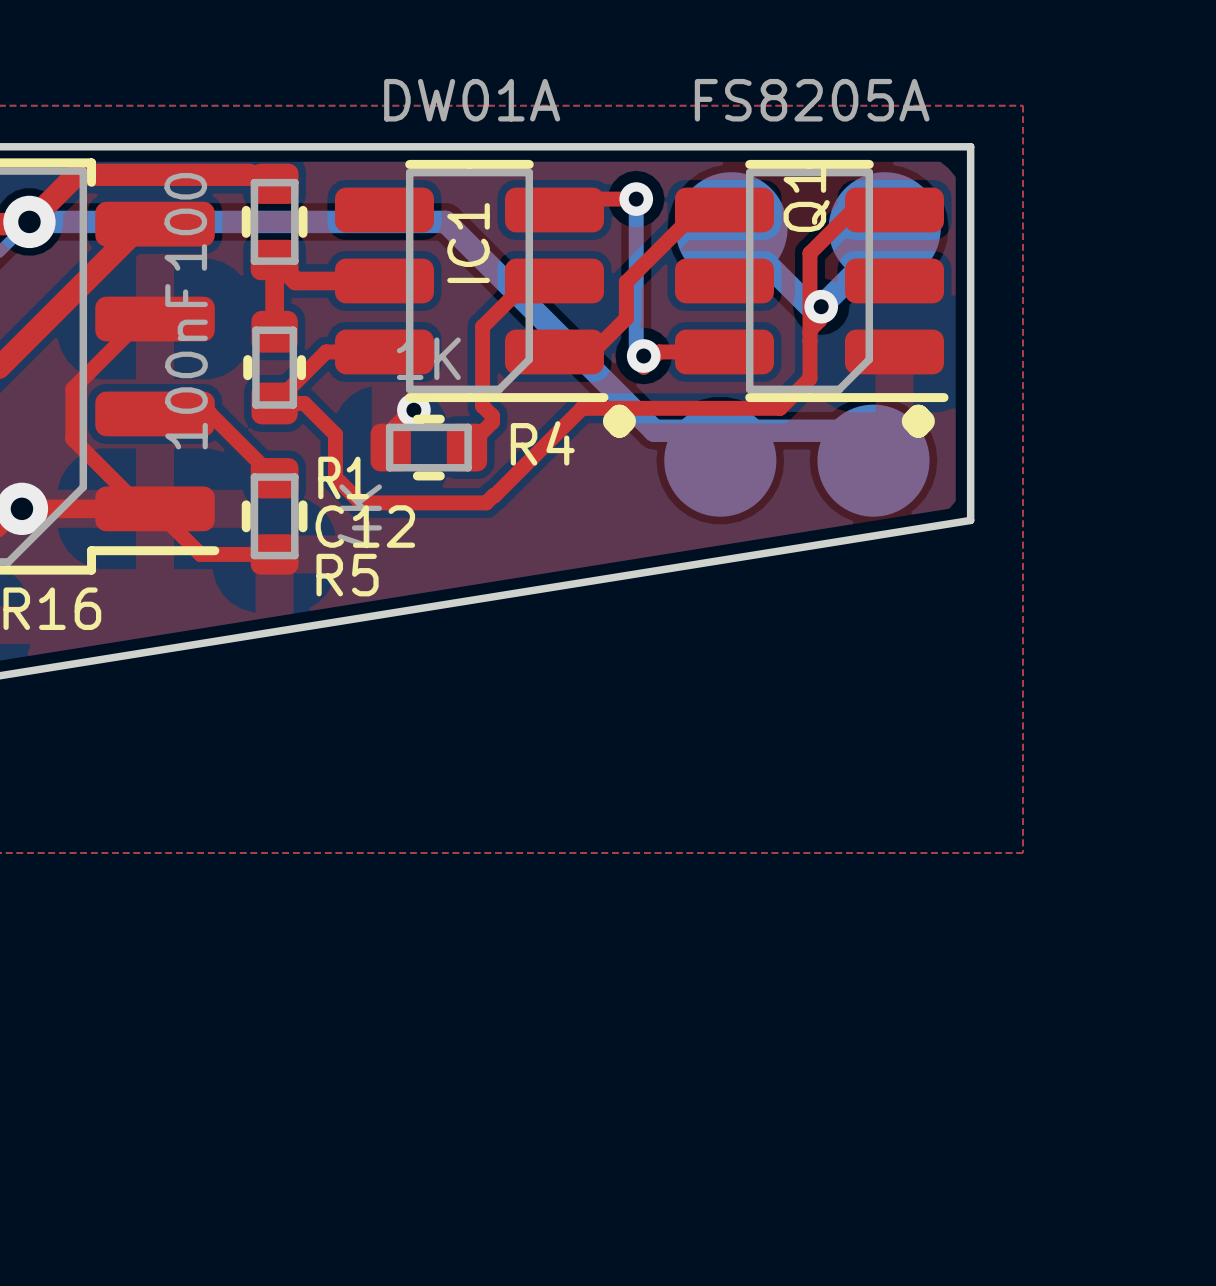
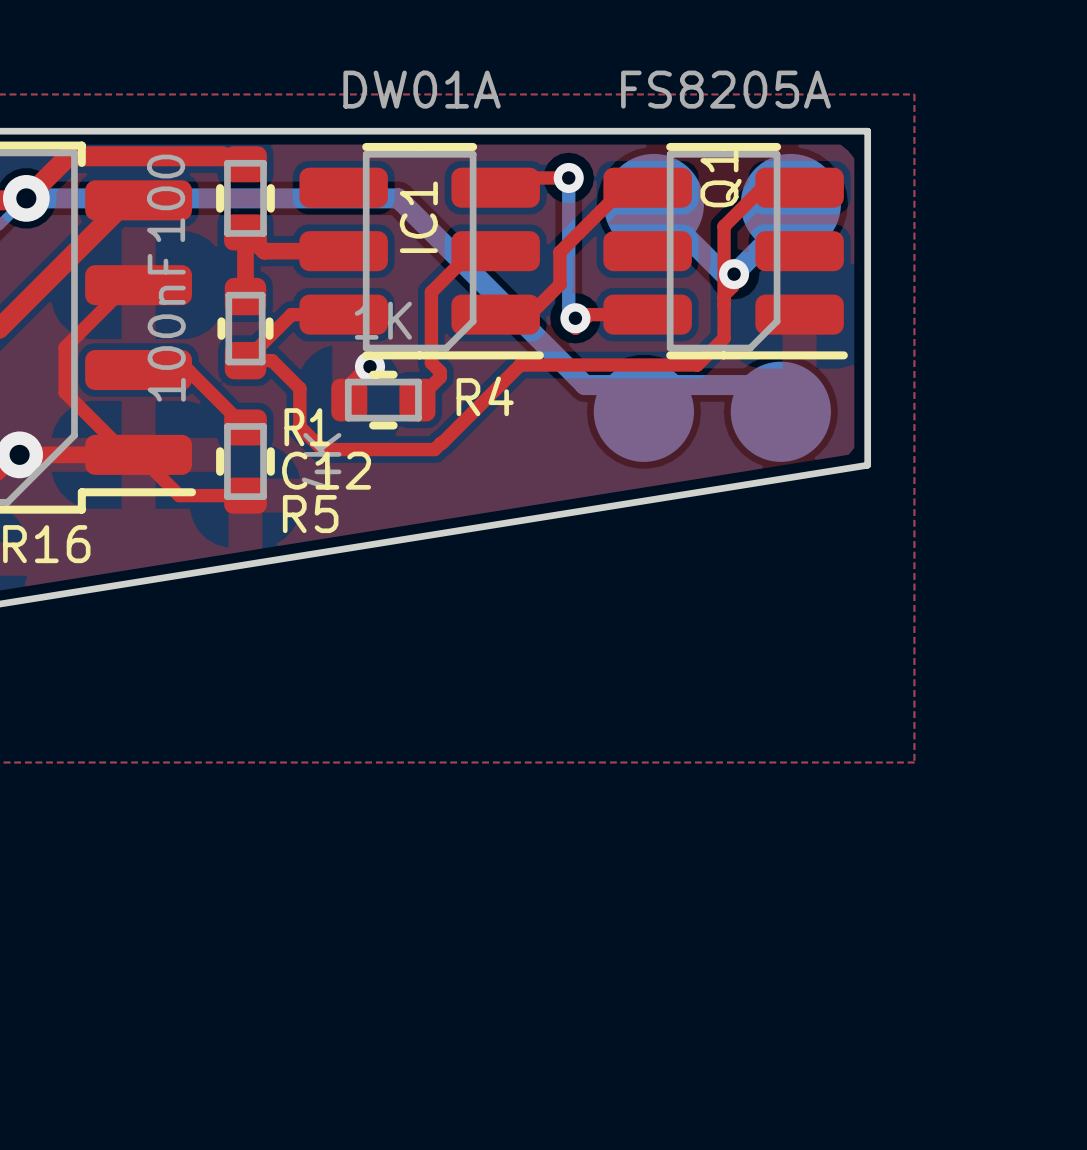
text: . (619, 421) -> none
text: . (918, 421) -> none

